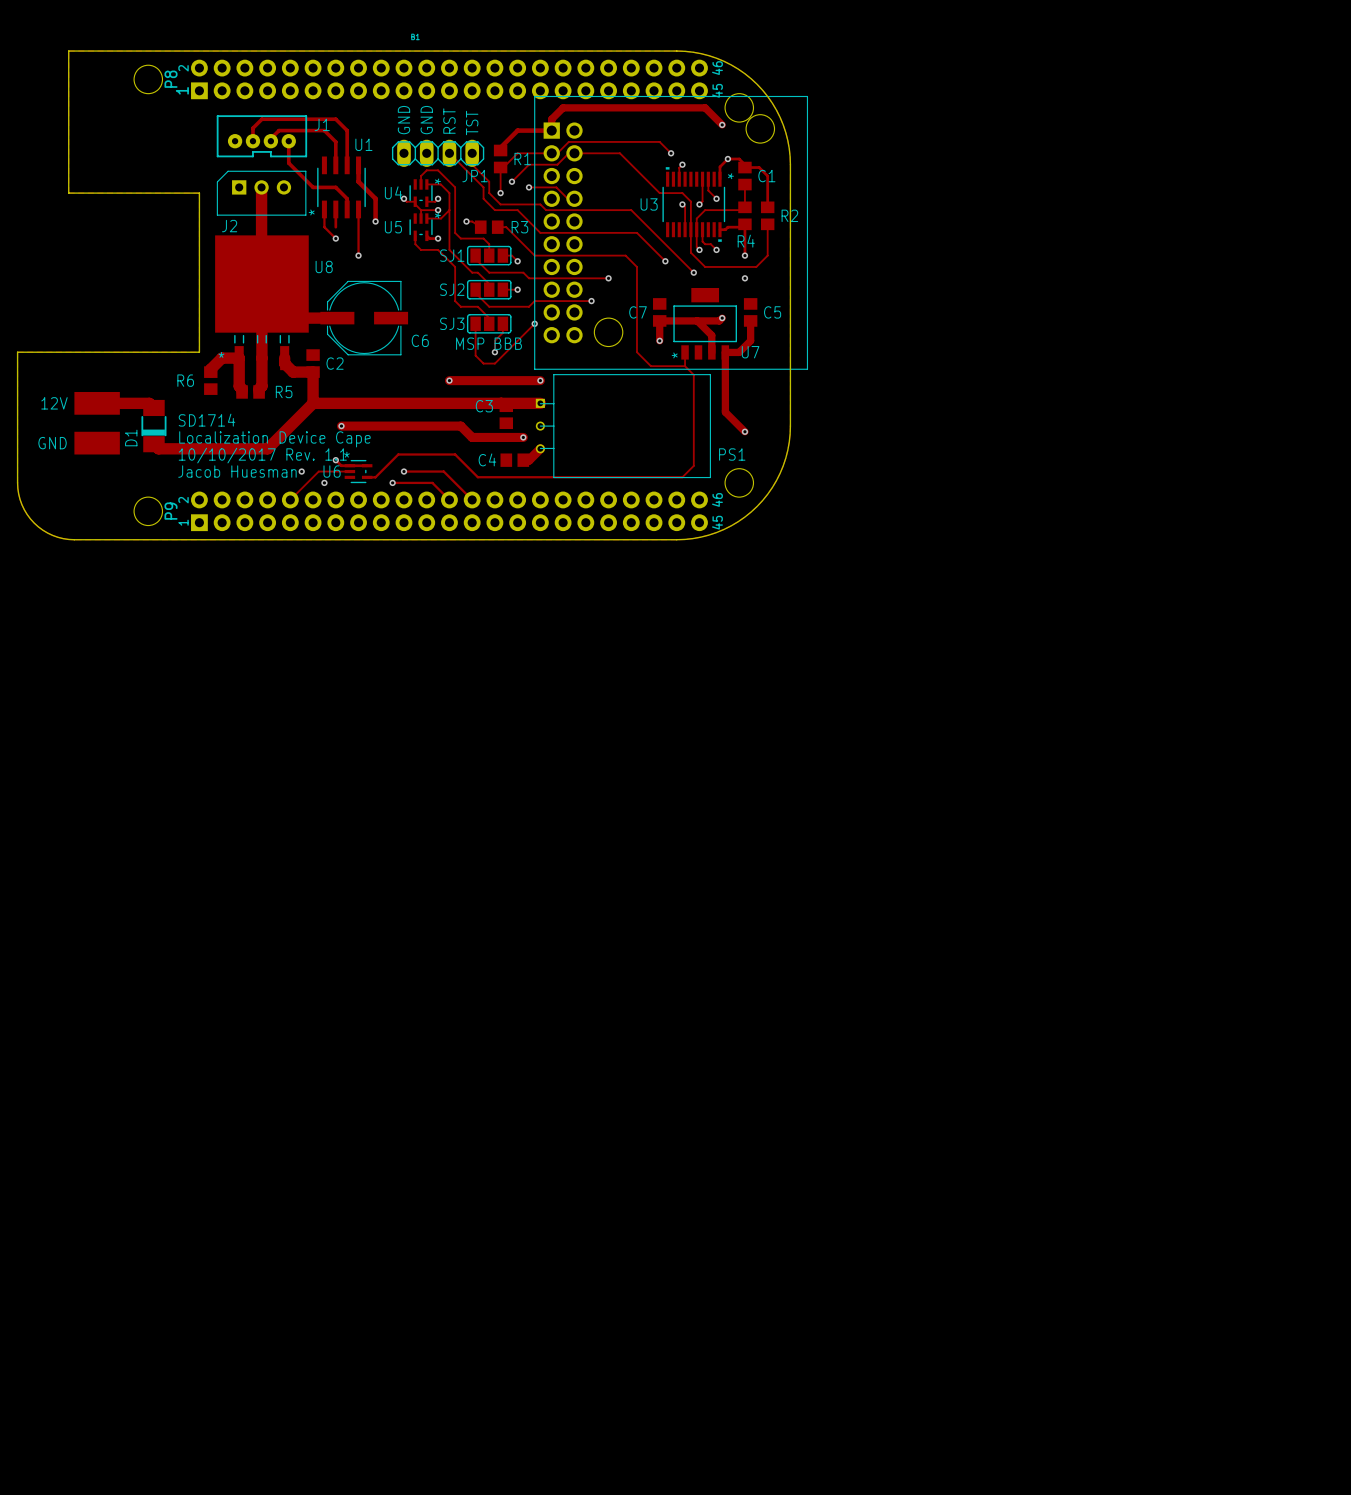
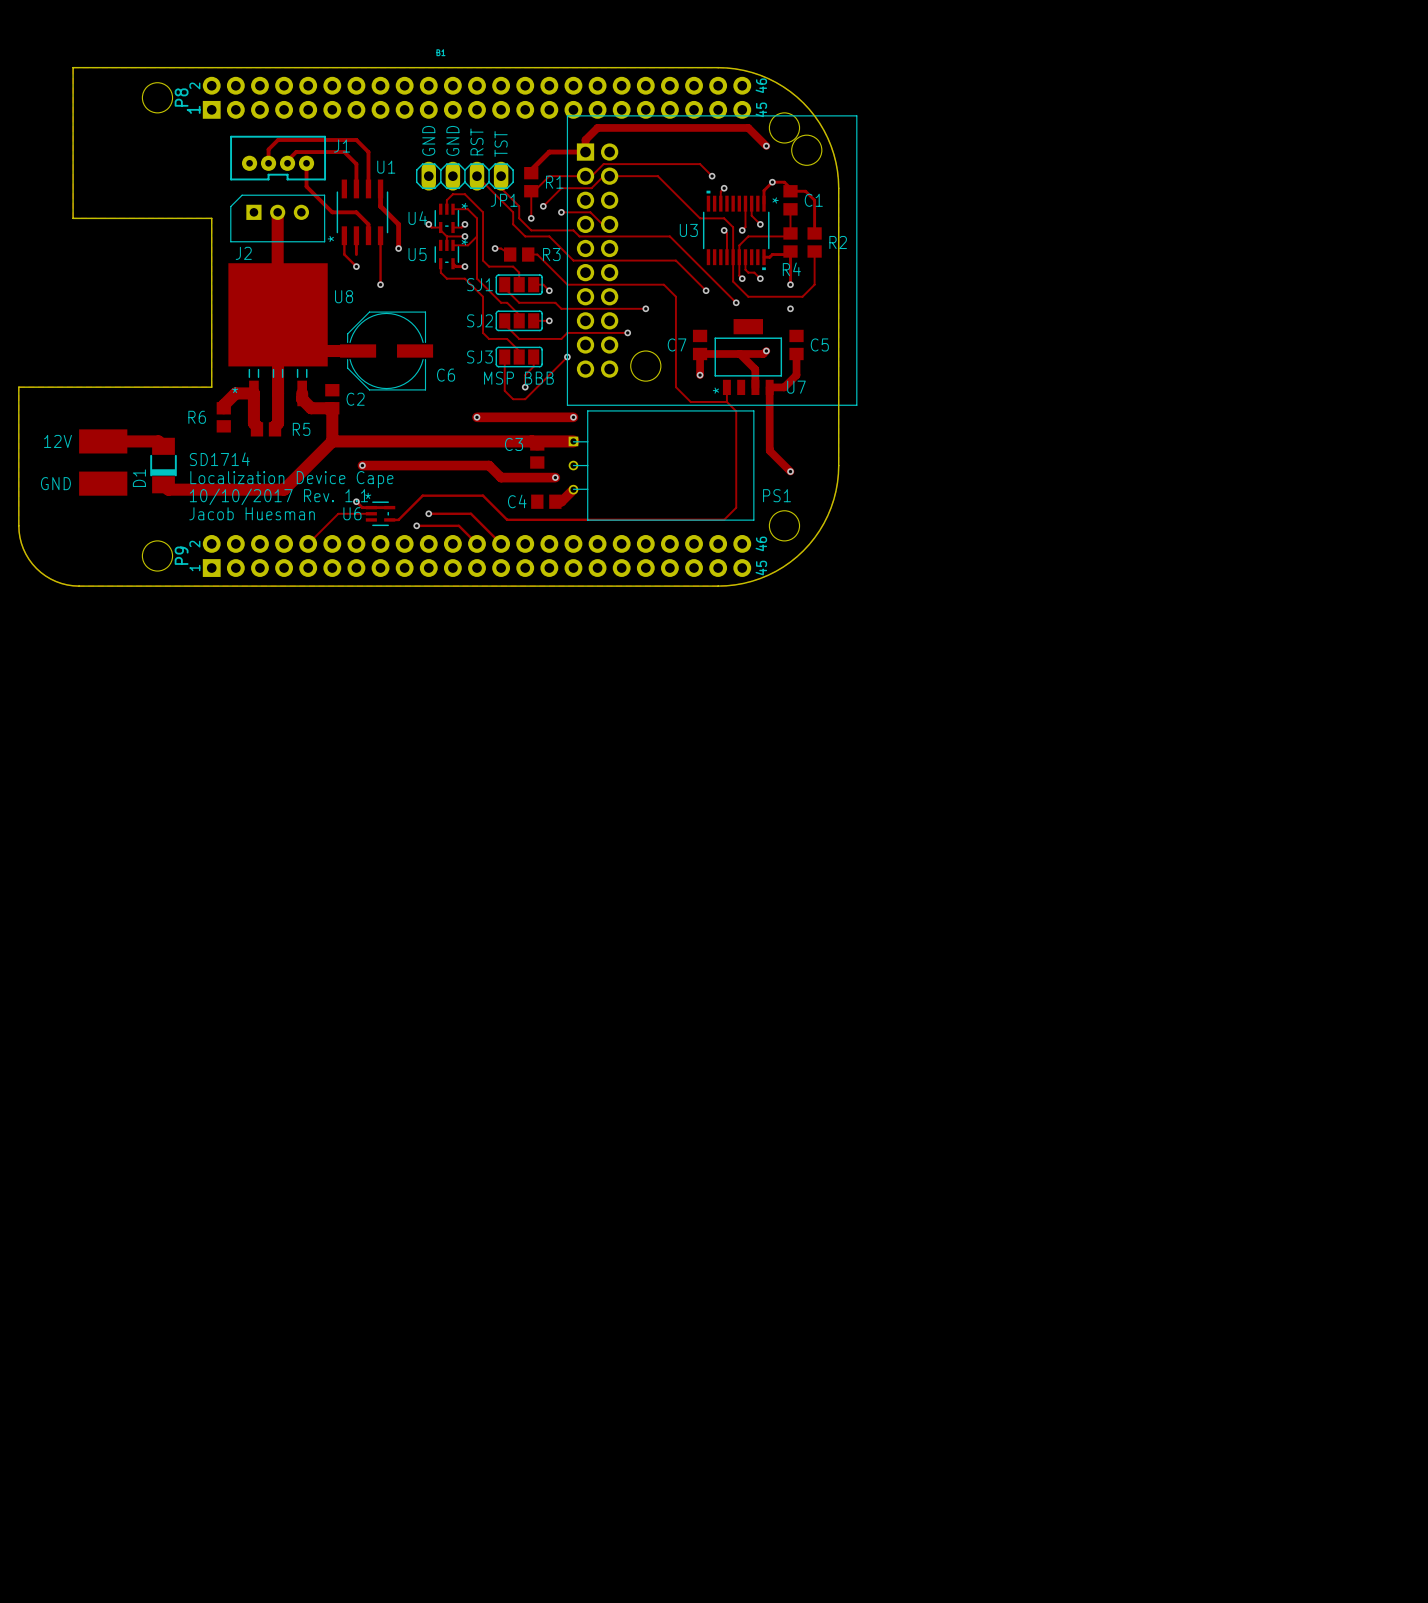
via: (301, 471) -> none
via: (324, 482) -> none

